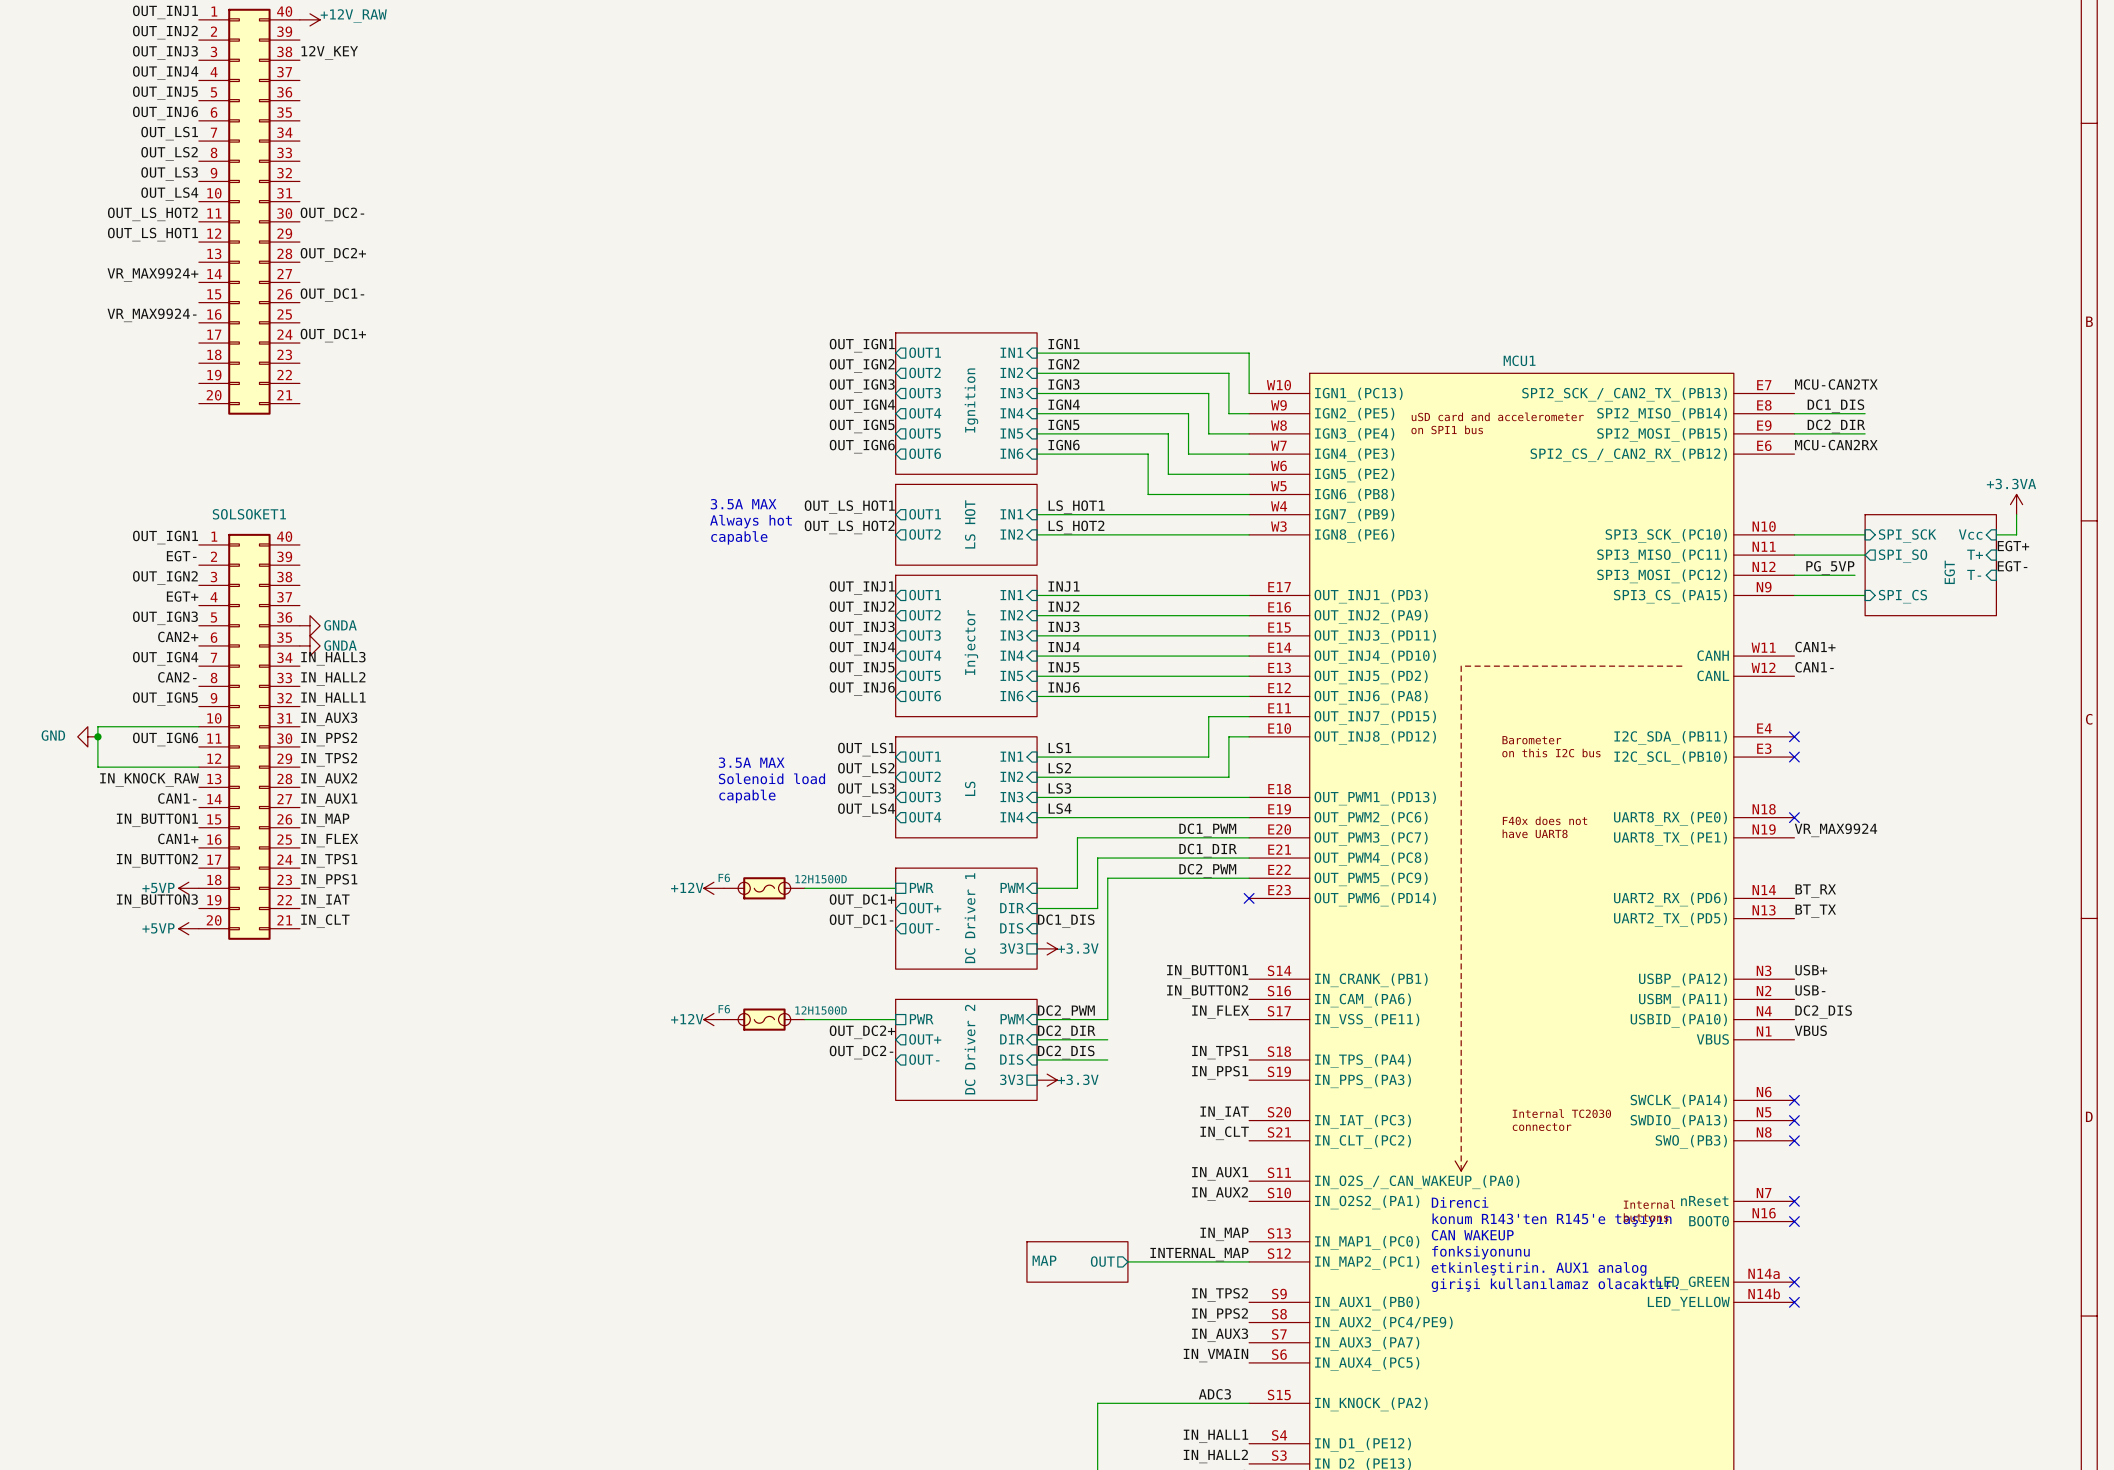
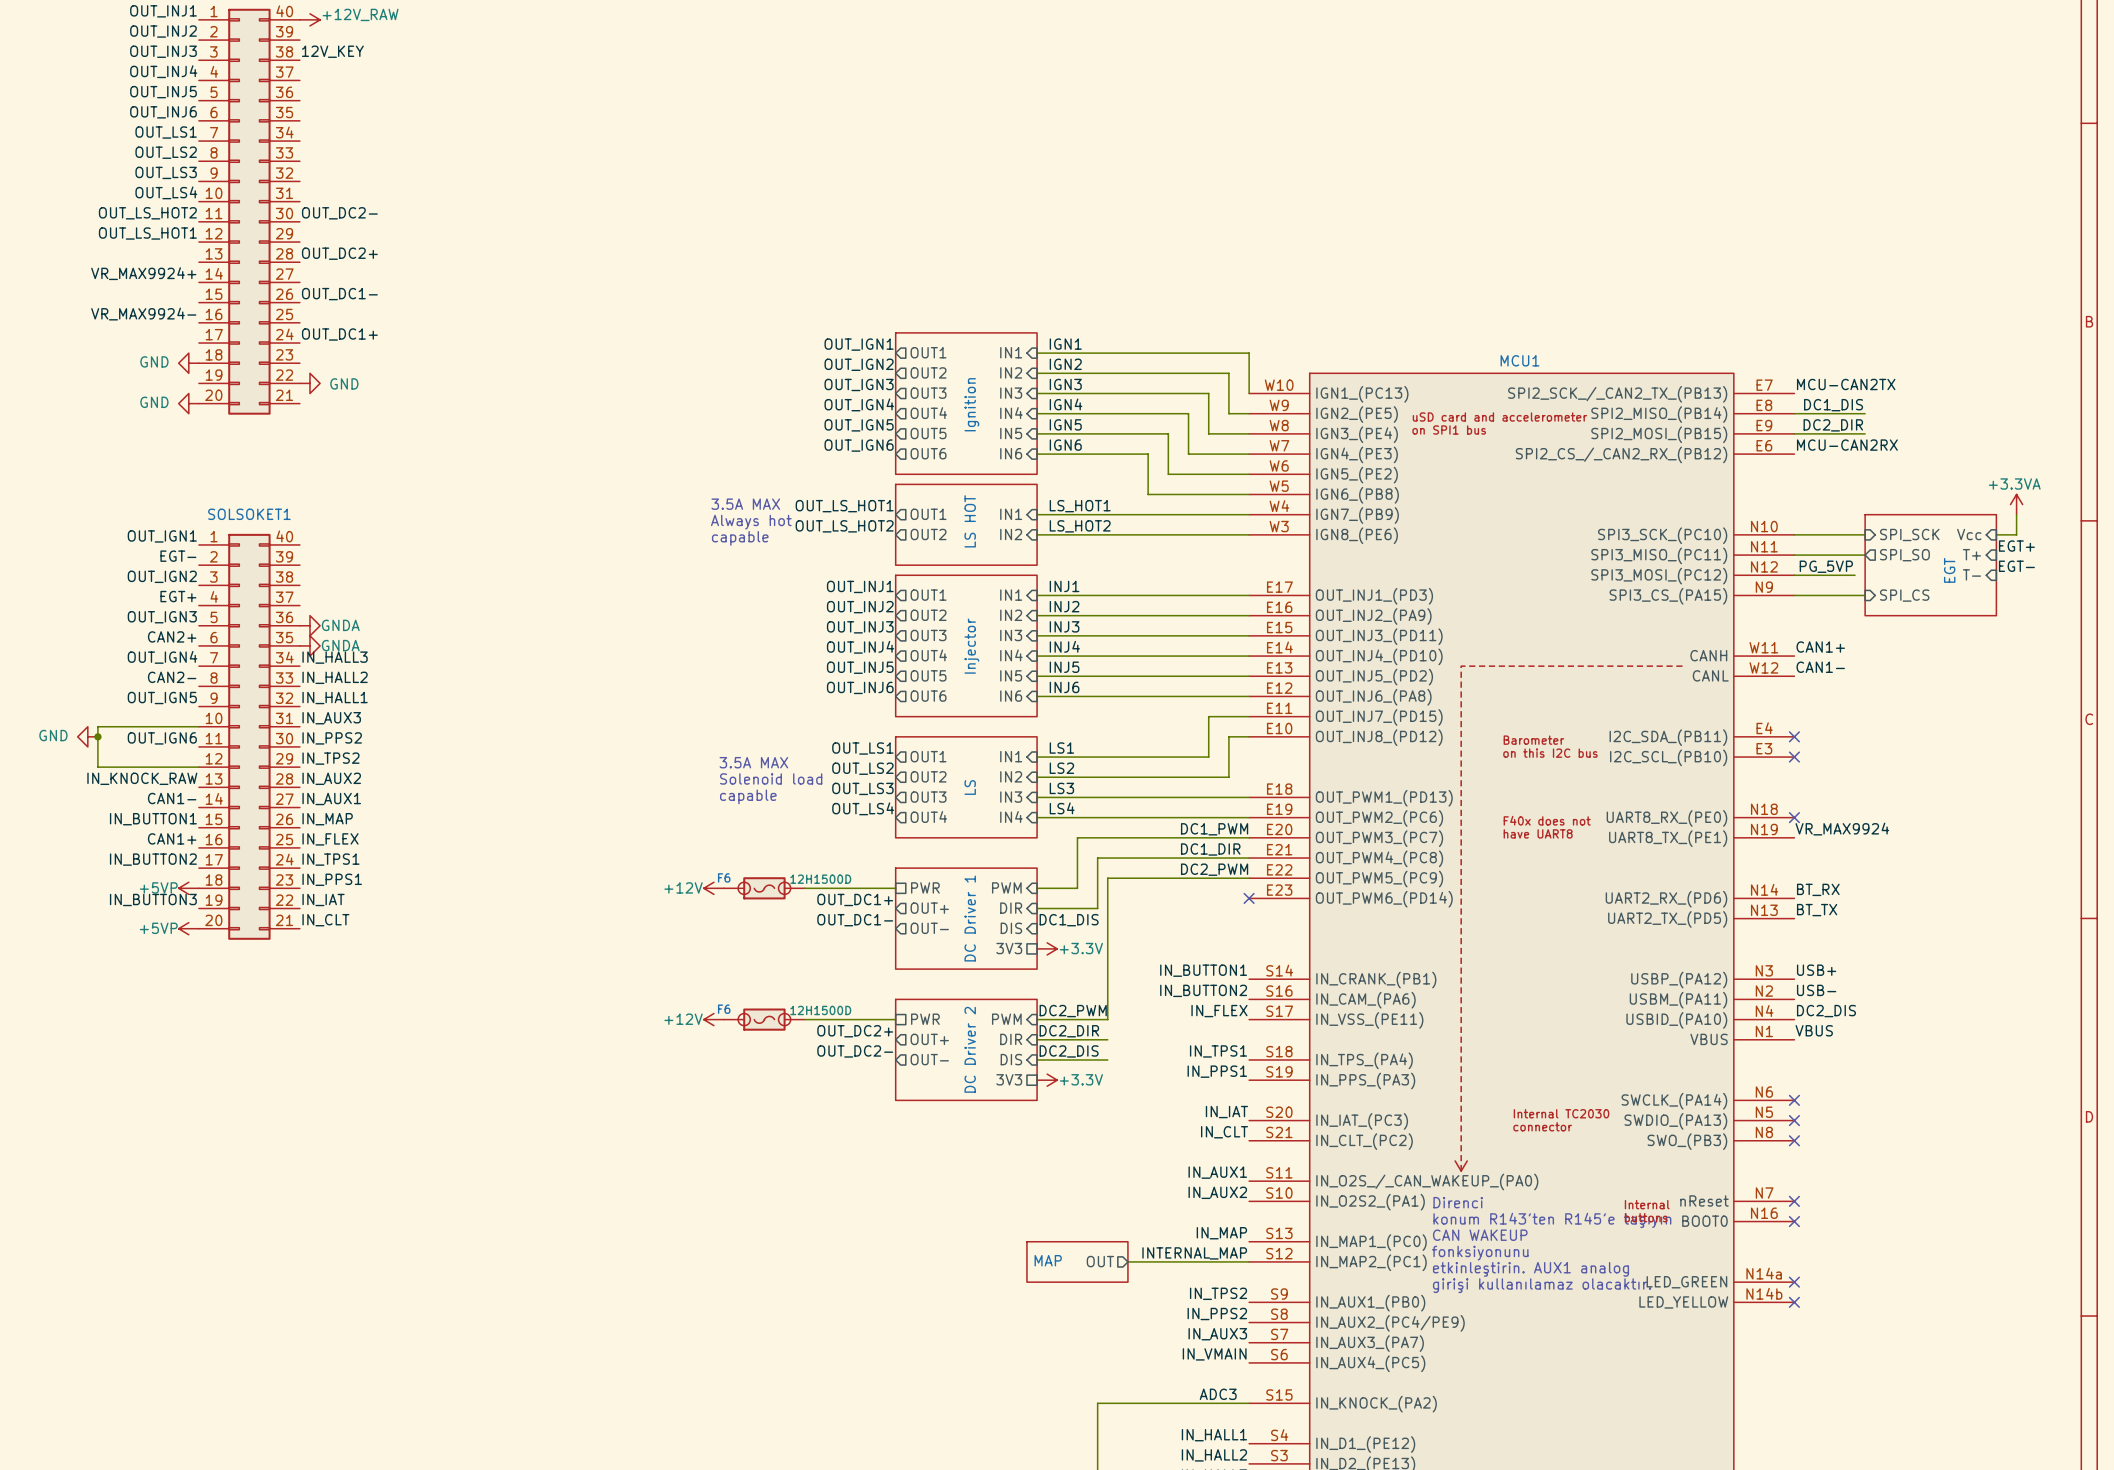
power symbol: none -> GND (188, 363)
power symbol: none -> GND (309, 383)
power symbol: none -> GND (188, 403)

